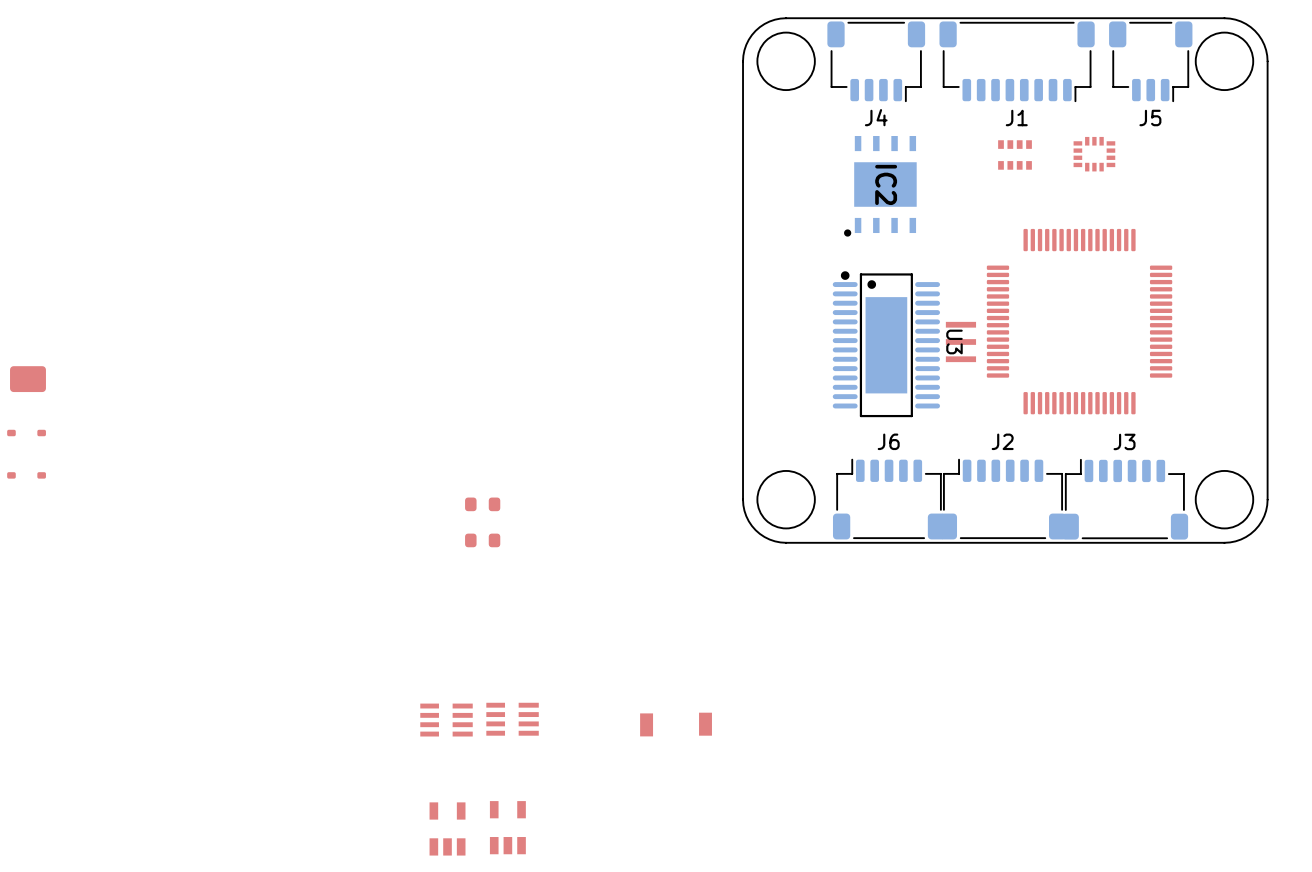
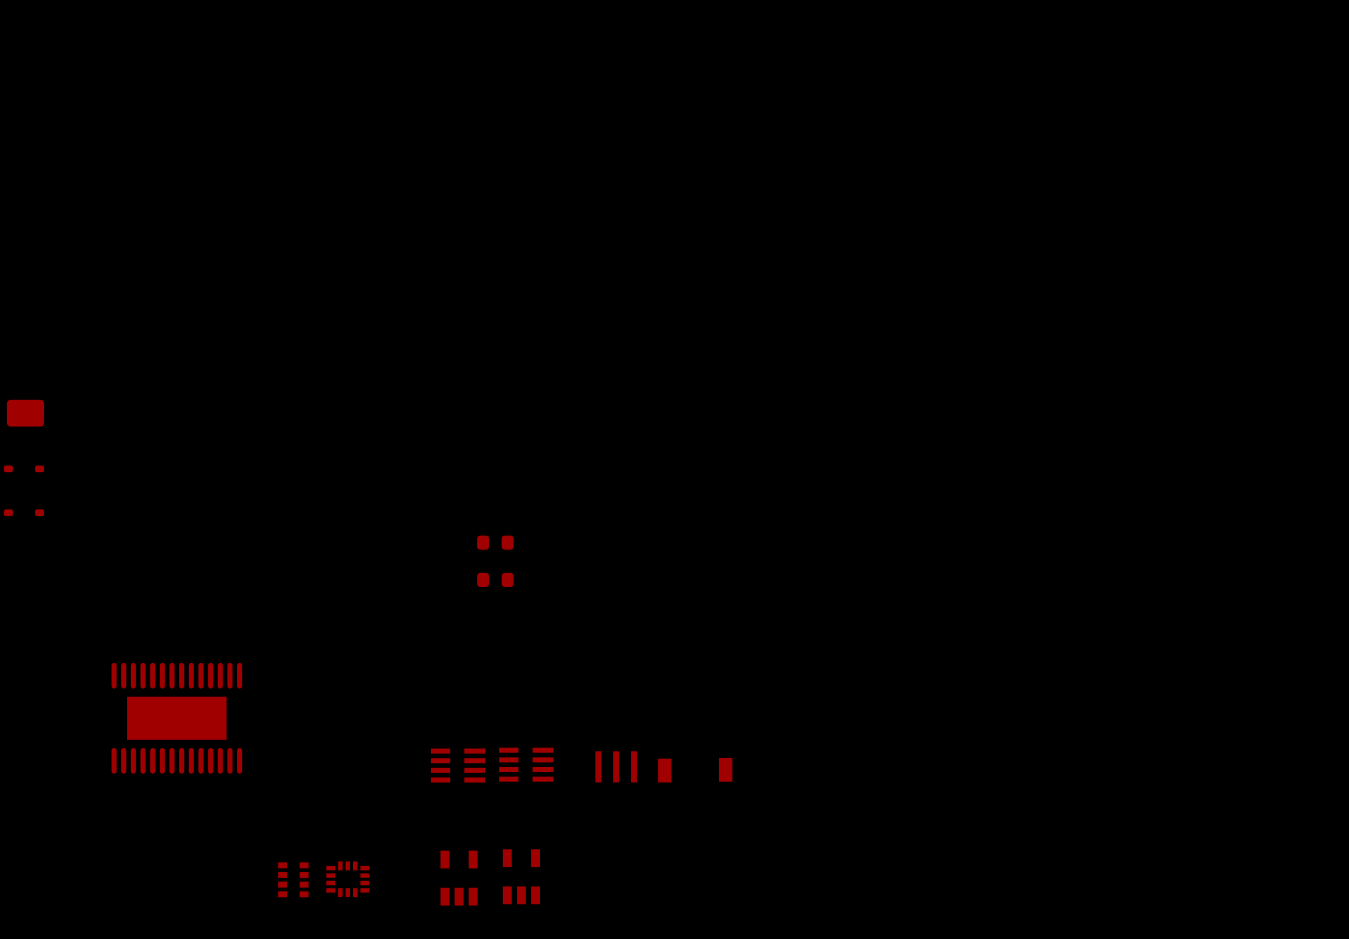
board edge: (1224, 18) (786, 18) (769, 21) (755, 30) (746, 44) (743, 61) (743, 499) (746, 516) (755, 530) (769, 539) (786, 542) (1224, 542) (1240, 539) (1254, 530) (1264, 516) (1267, 499) (1267, 61) (1264, 44) (1254, 30) (1240, 21) (1224, 18) -> none
round board edge: [757, 32, 816, 91] -> none
round board edge: [1195, 32, 1254, 91] -> none
J4: (876, 61) -> none
J1: (1017, 61) -> none
J5: (1150, 61) -> none
part: (1015, 154) -> none
part: (1094, 154) -> none
IC2: (880, 186) -> none
part: (1079, 321) -> none
part: (960, 341) -> none
U3: (886, 344) -> none
round board edge: [757, 470, 816, 529] -> none
round board edge: [1195, 470, 1254, 529] -> none
J6: (889, 499) -> none
J2: (1003, 499) -> none
J3: (1124, 499) -> none
part: none -> (176, 718)
part: none -> (616, 766)
part: none -> (293, 879)
part: none -> (347, 879)

